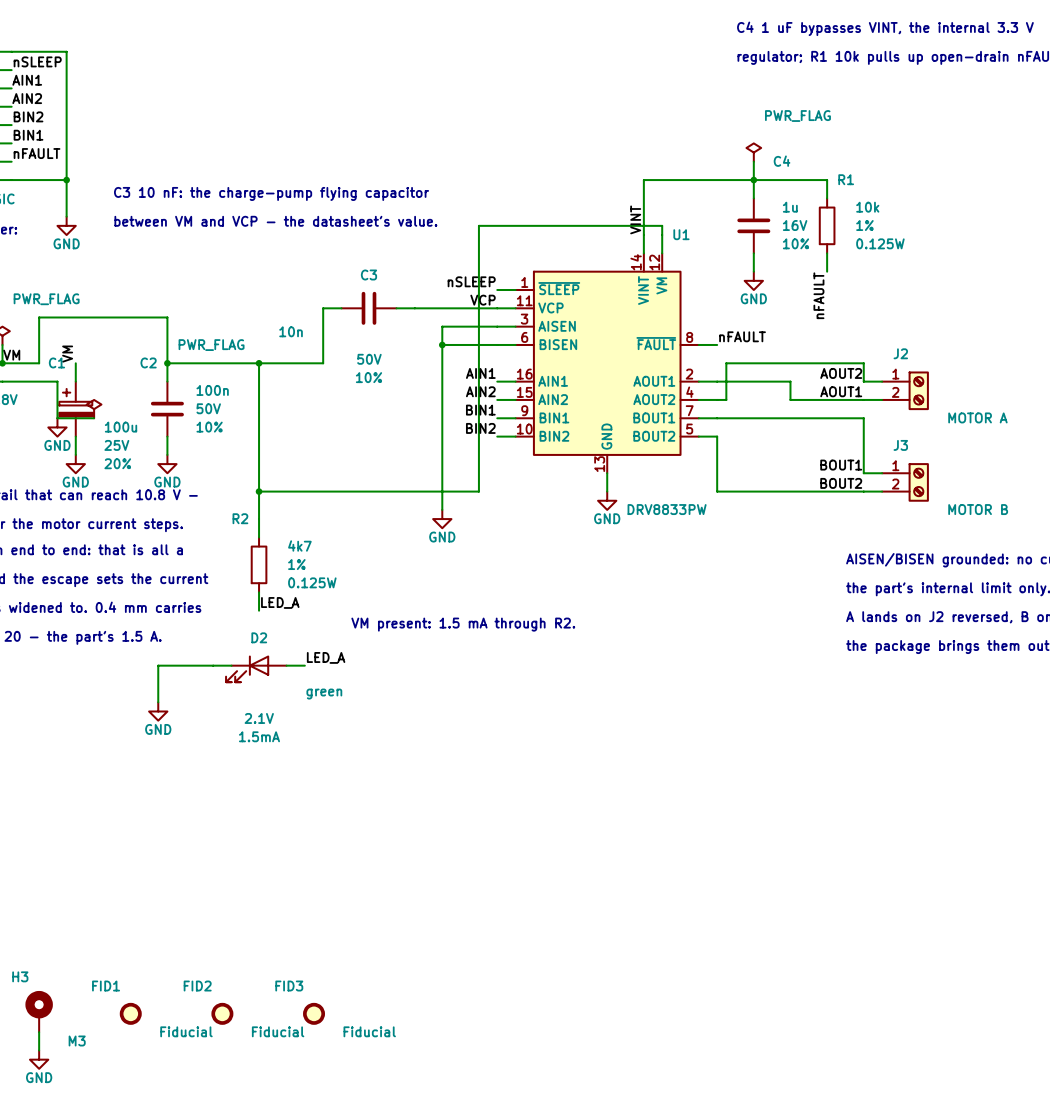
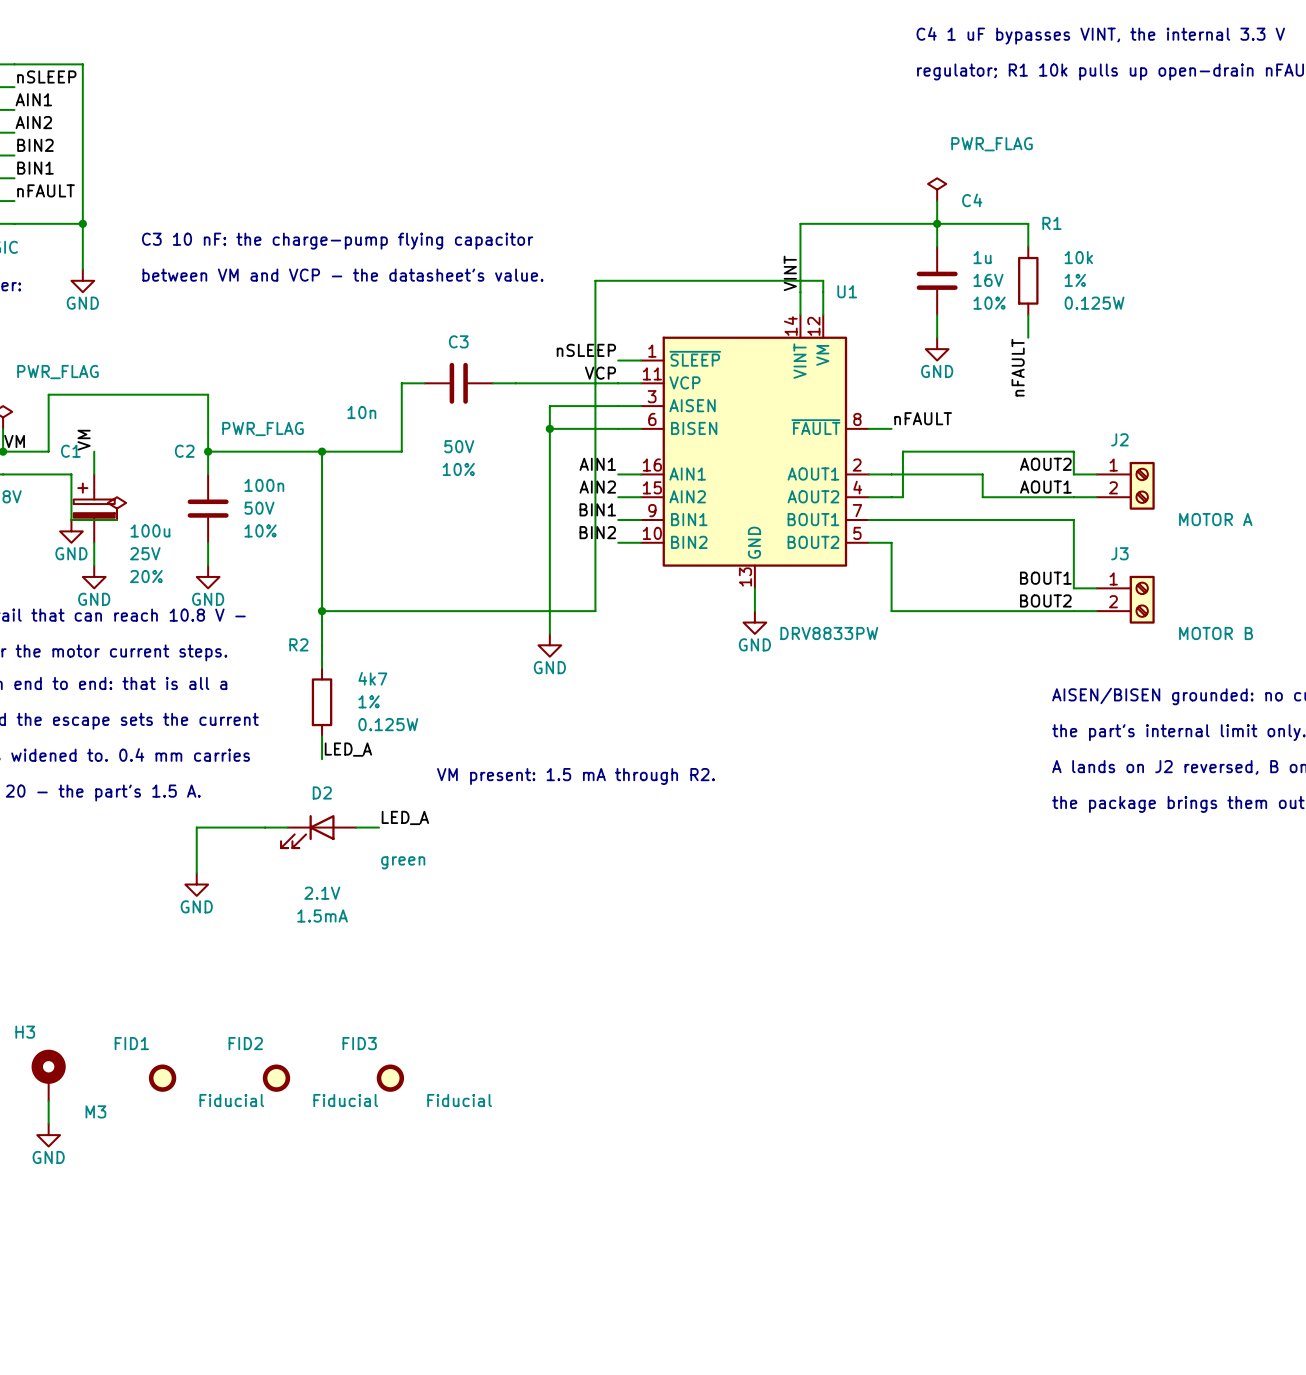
H3 position: (39, 1011) -> (48, 1075)
FID1 position: (130, 1013) -> (162, 1078)
FID2 position: (222, 1013) -> (276, 1078)
FID3 position: (314, 1013) -> (390, 1078)
wire: (39, 1032) (39, 1050) -> (48, 1100) (48, 1123)
power symbol position: GND (39, 1059) -> GND (48, 1135)

